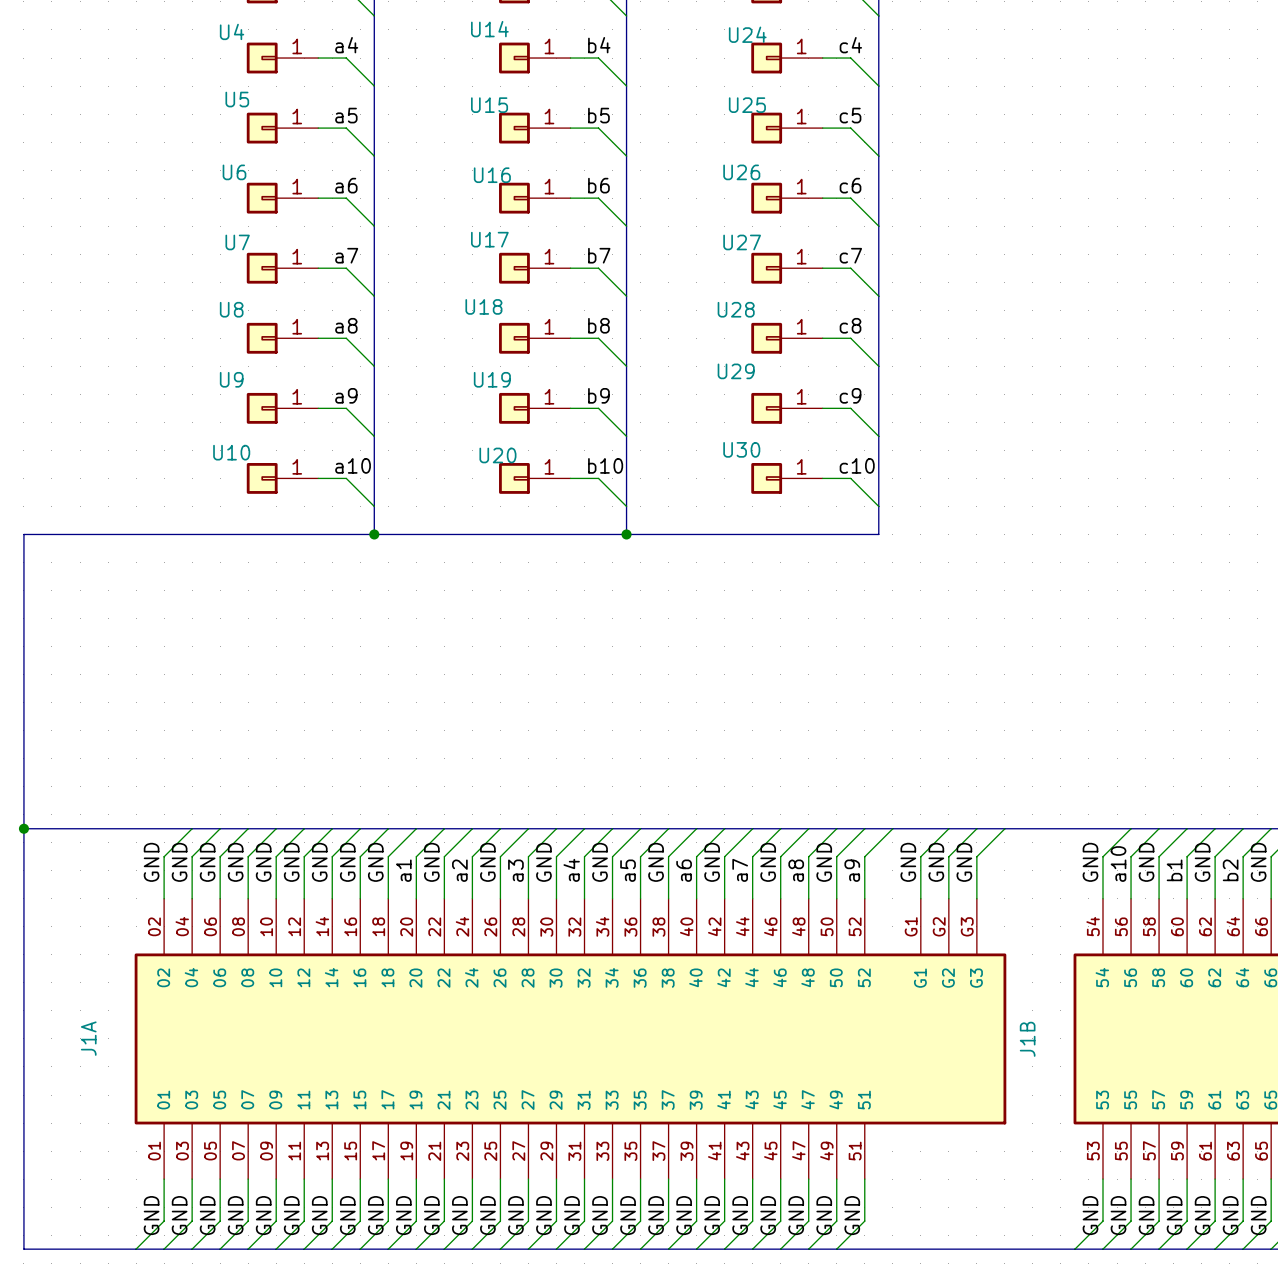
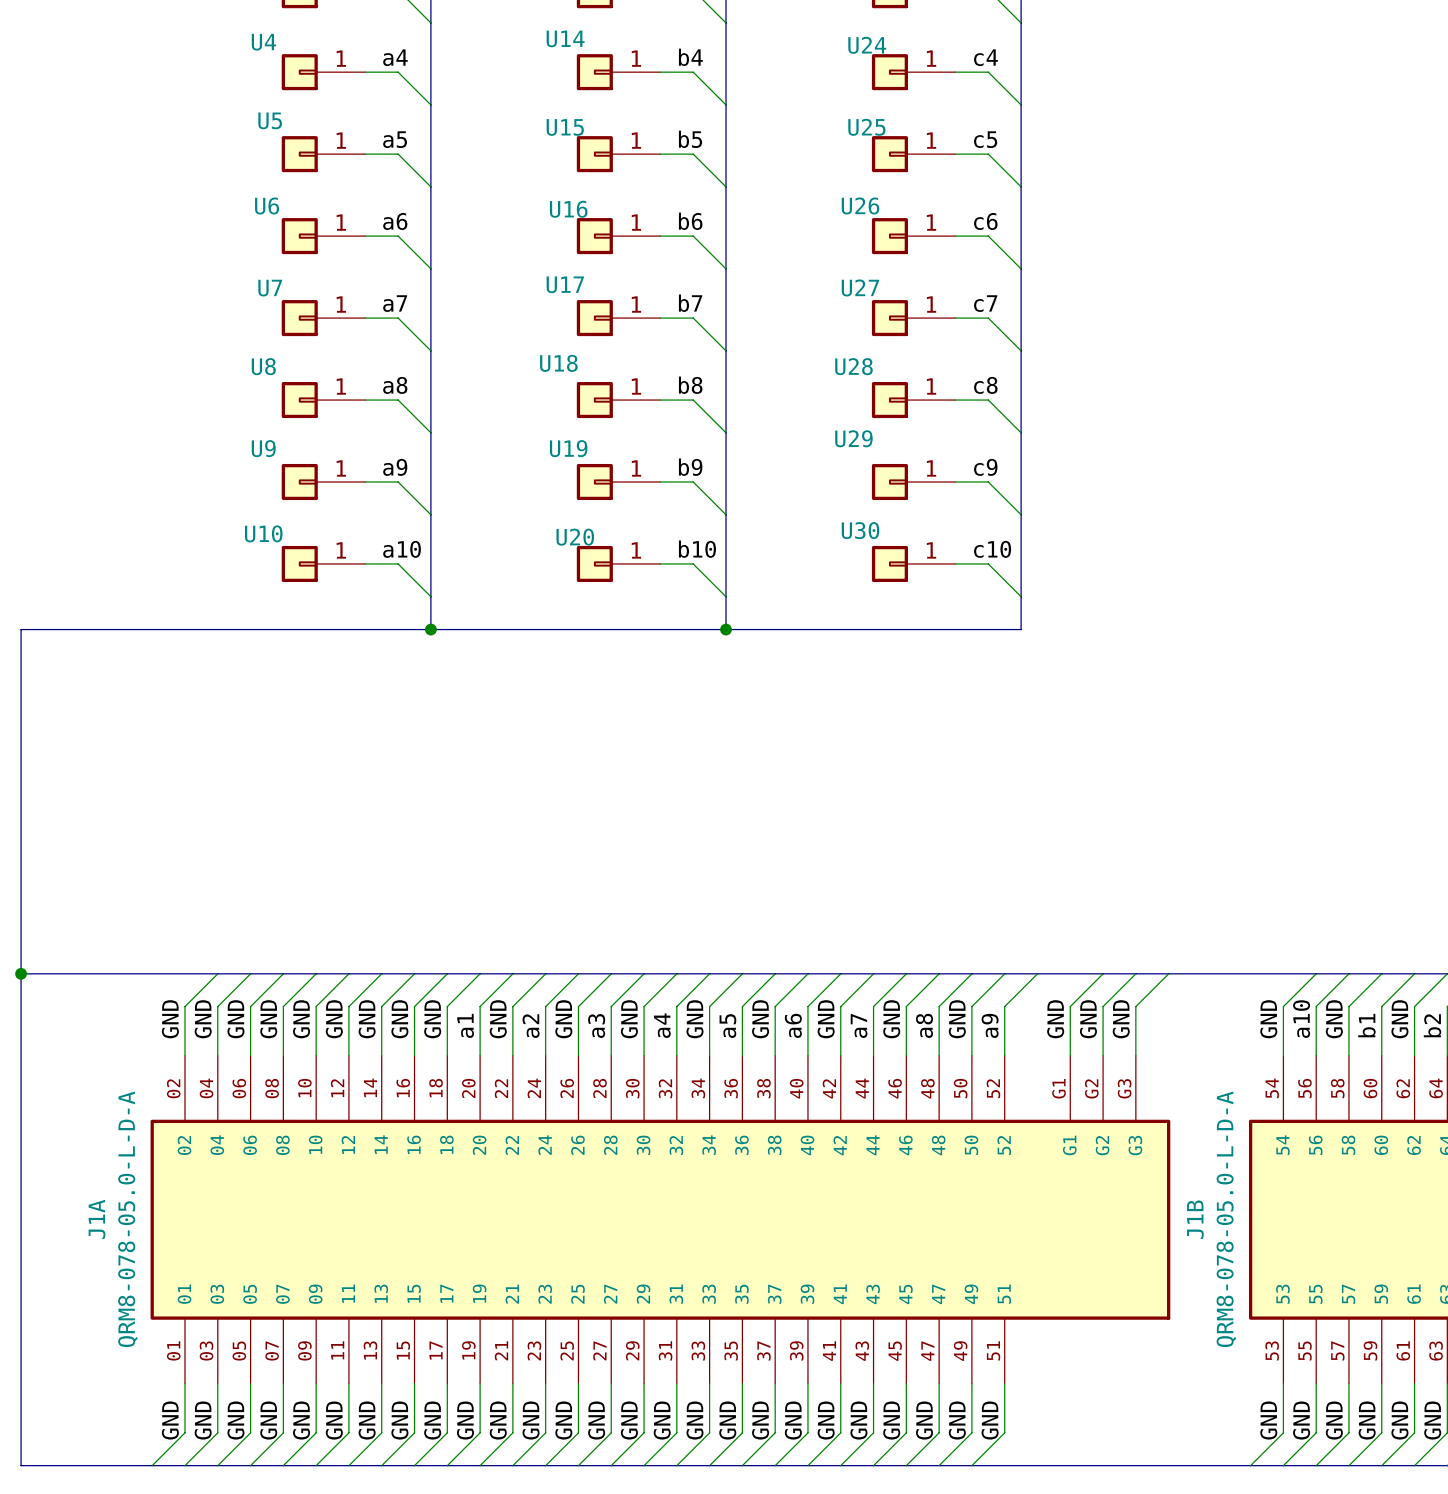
J1A value: none -> QRM8-078-05.0-L-D-A (128, 1219)
J1B value: none -> QRM8-078-05.0-L-D-A (1226, 1219)

